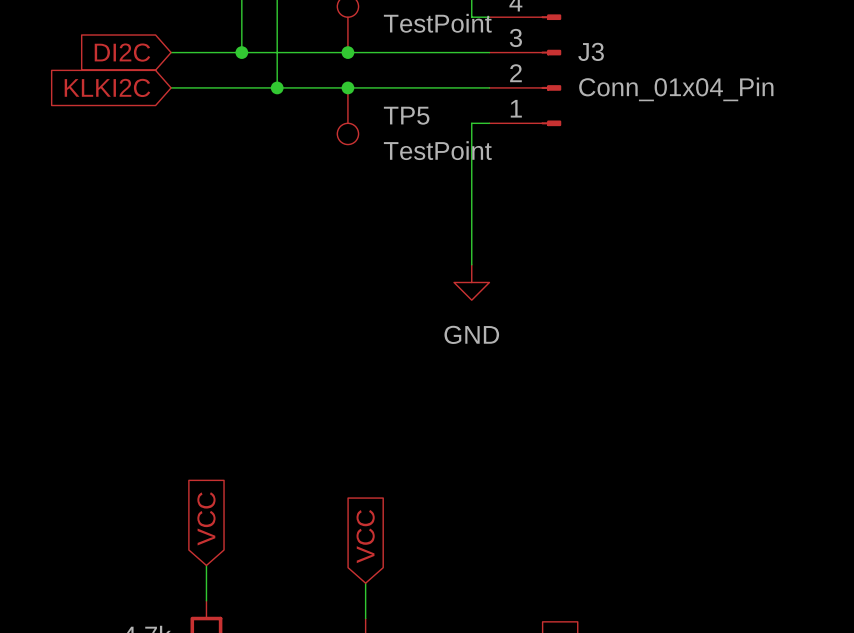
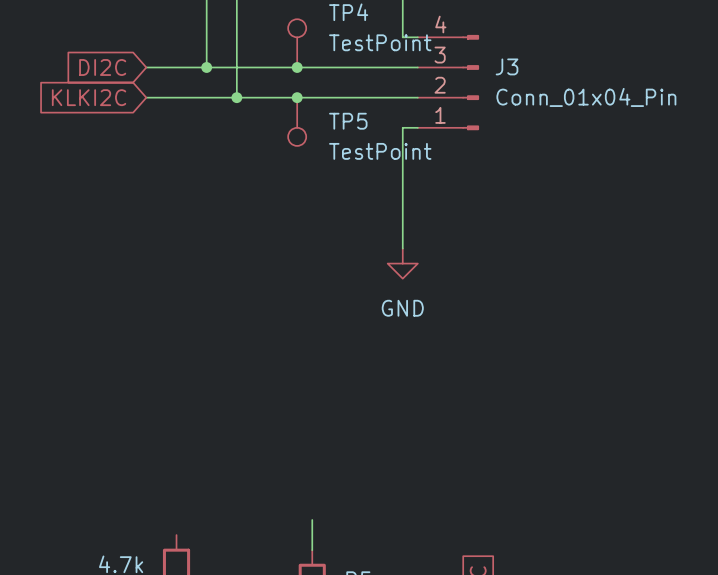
global label: VCC (206, 518) -> none
global label: VCC (365, 536) -> none
wire: (206, 565) (206, 600) -> none

